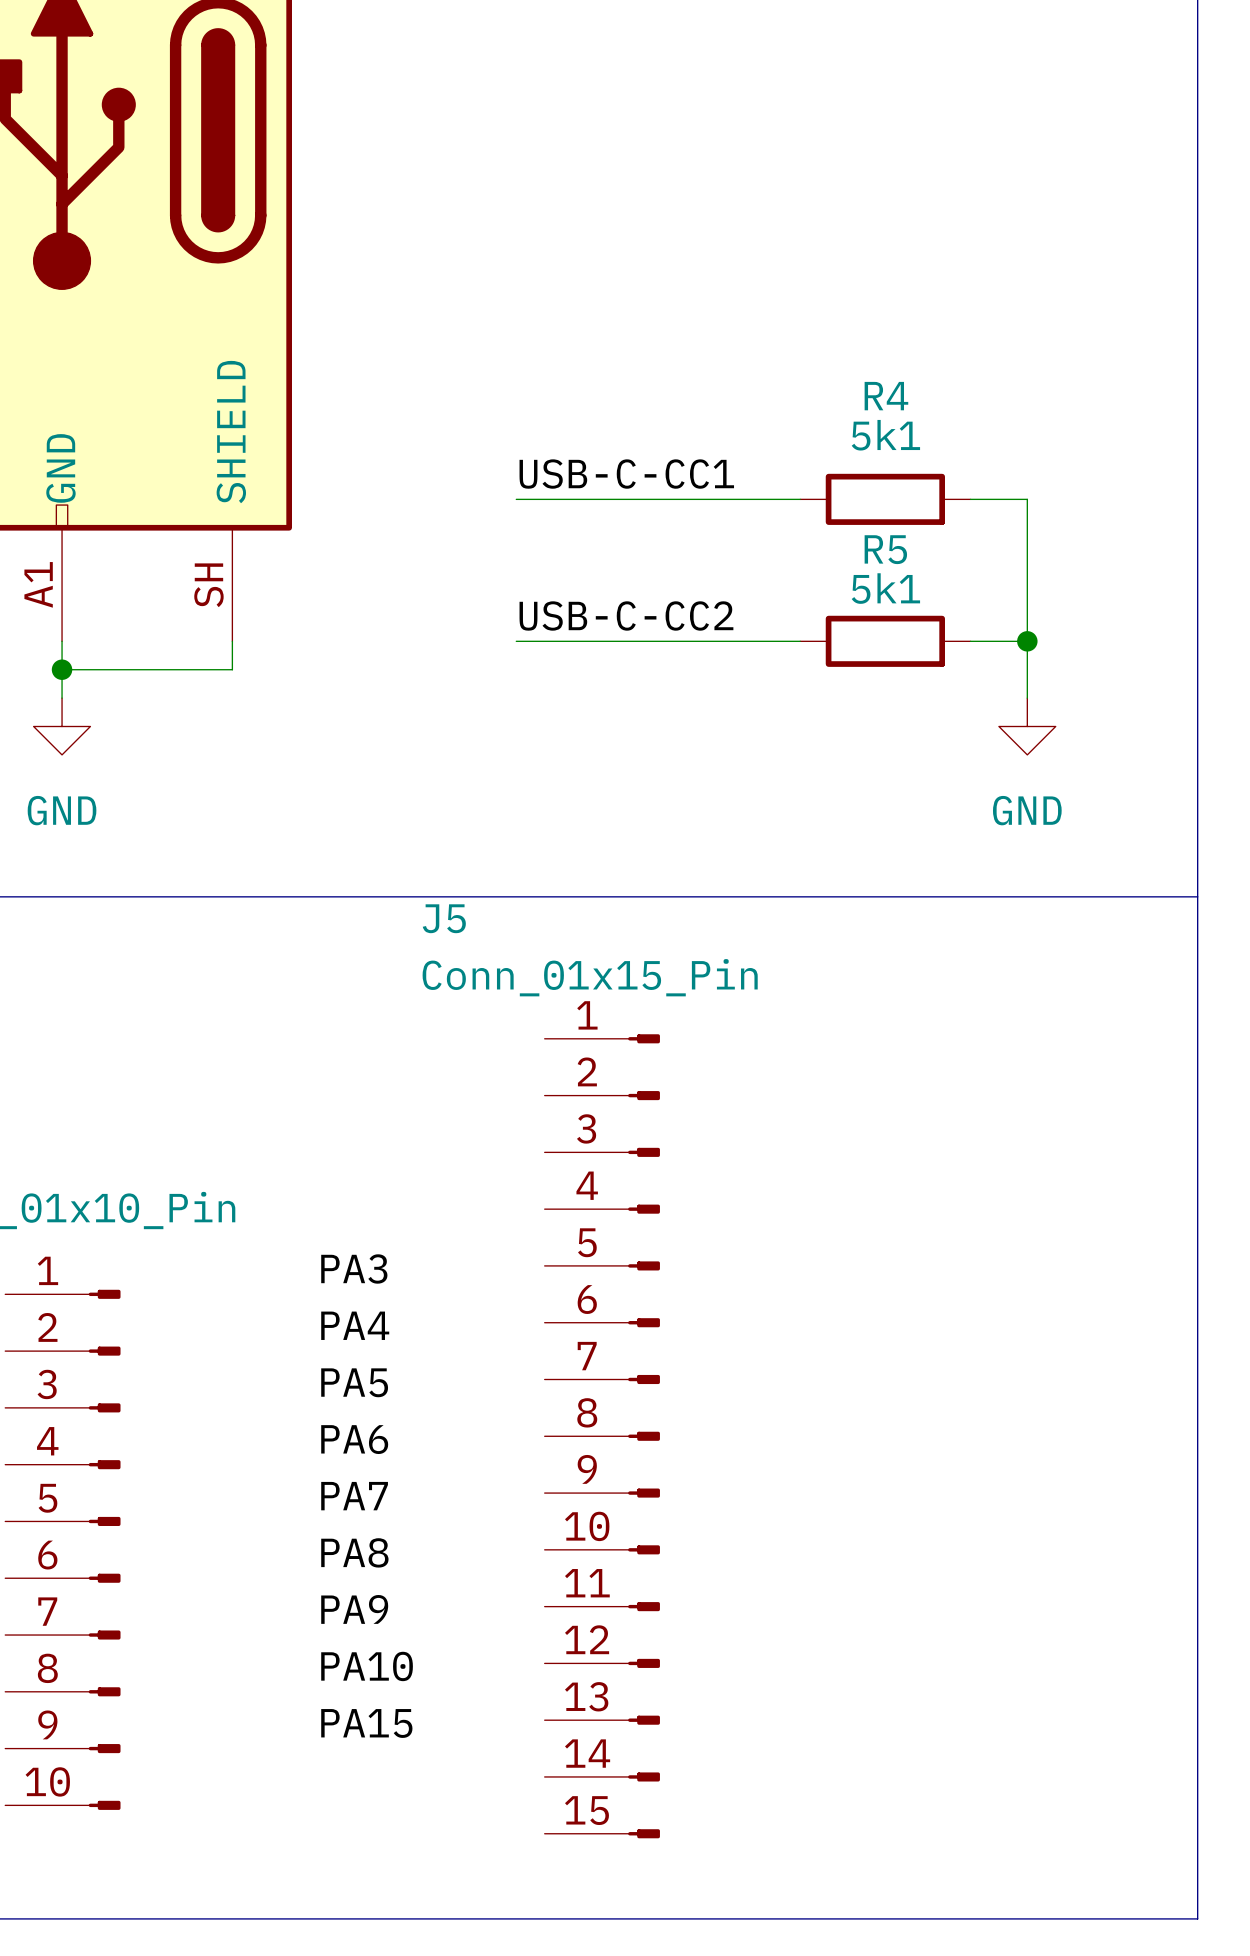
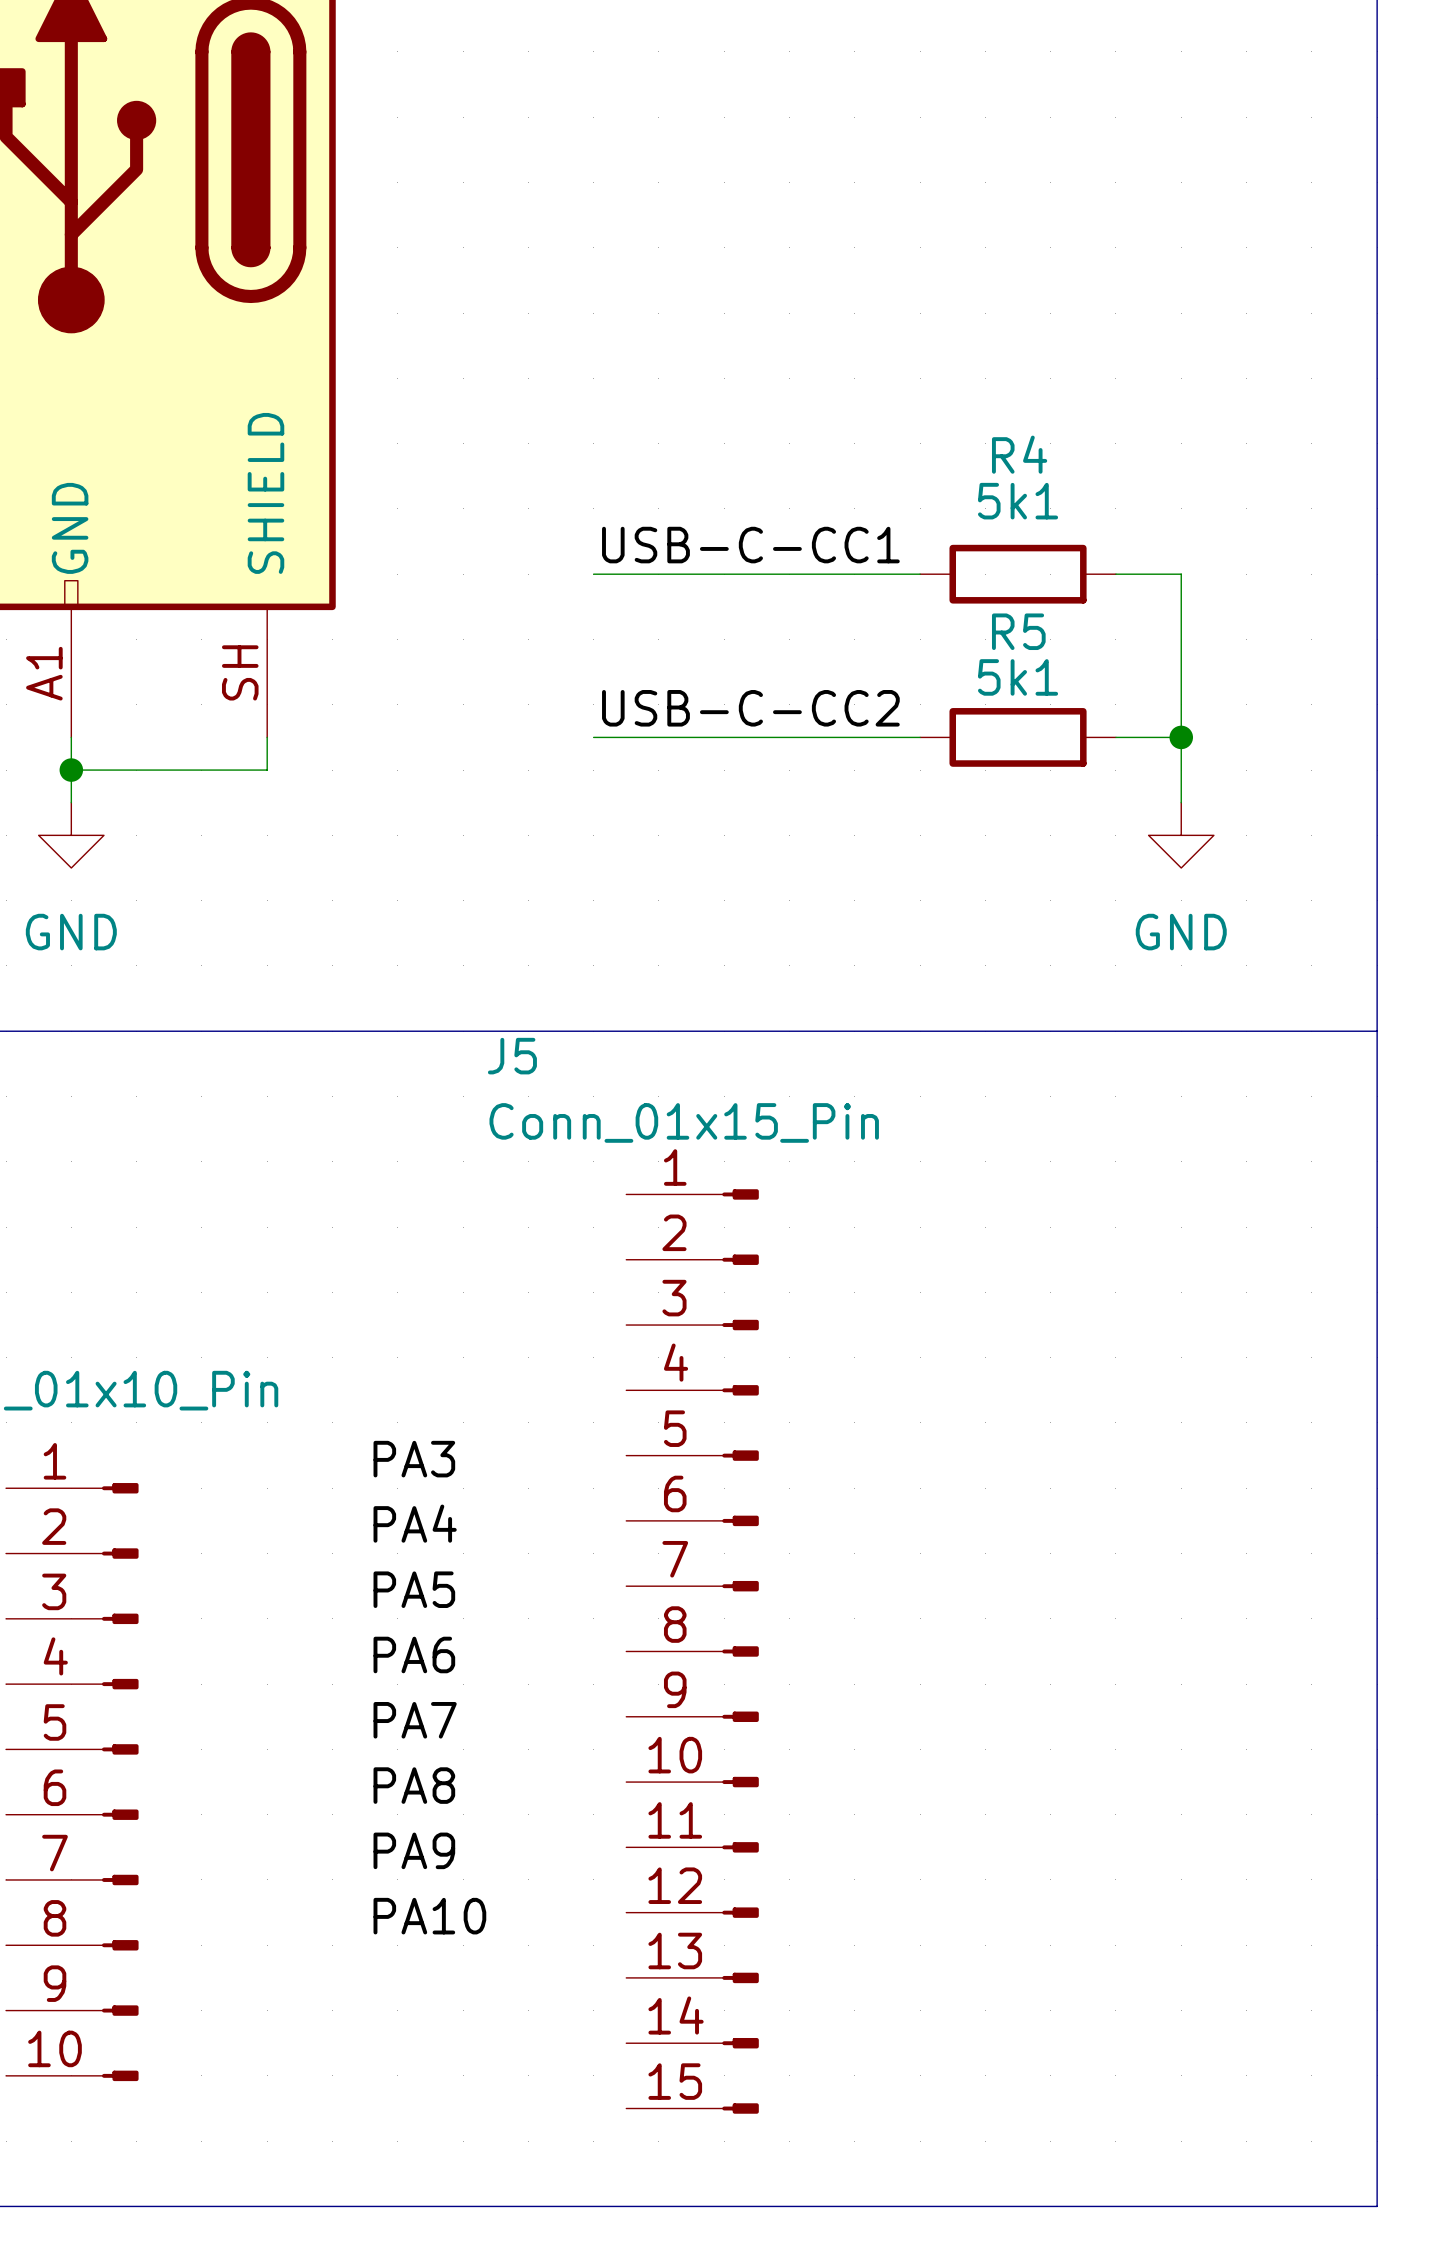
label: PA15 (366, 1723) -> none

